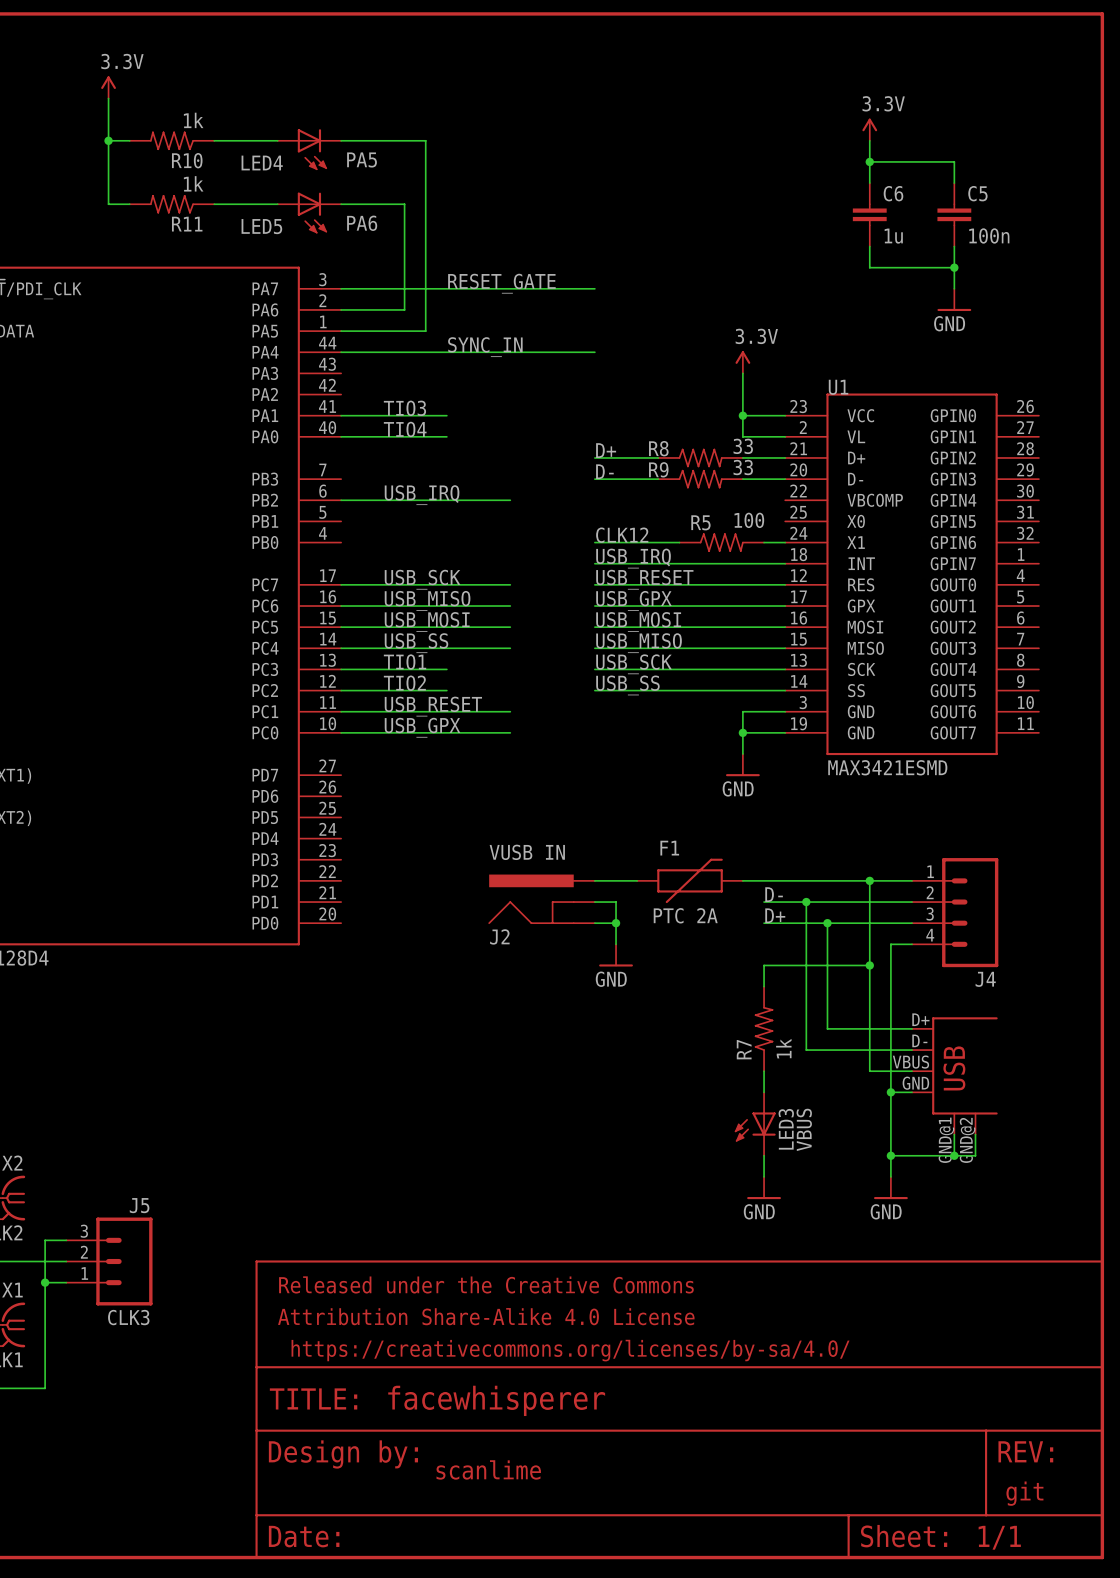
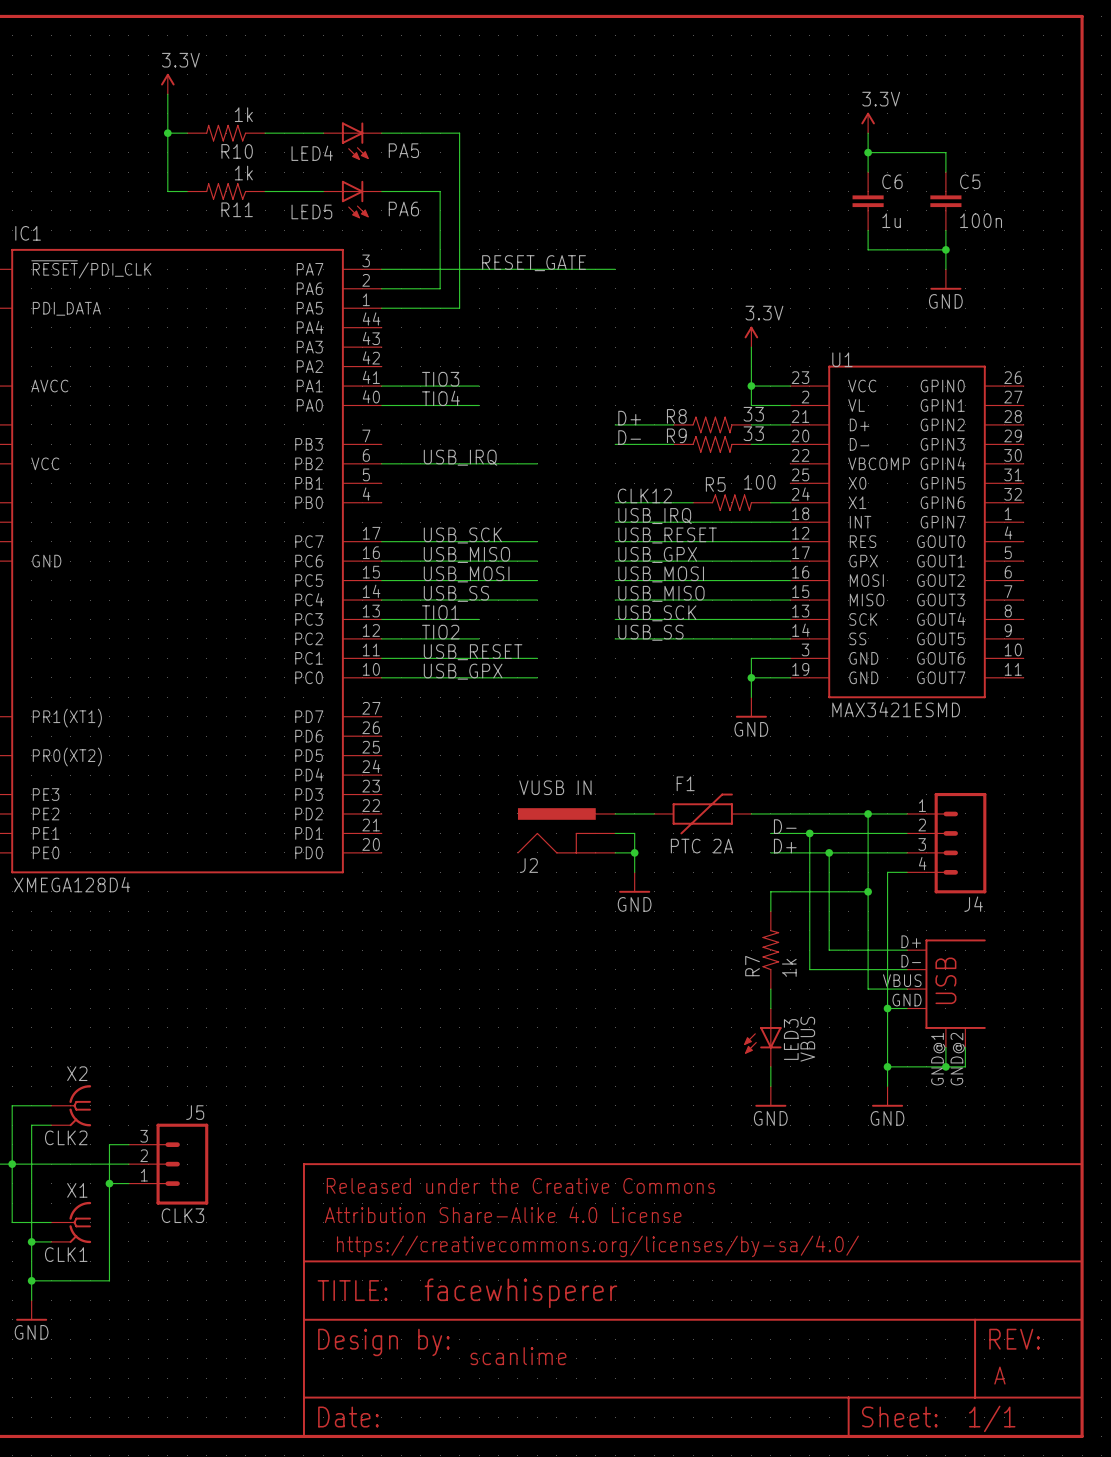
label: SYNC_IN (485, 347) -> none
wire: (341, 352) (594, 352) -> none
text: git (1024, 1493) -> A (999, 1375)

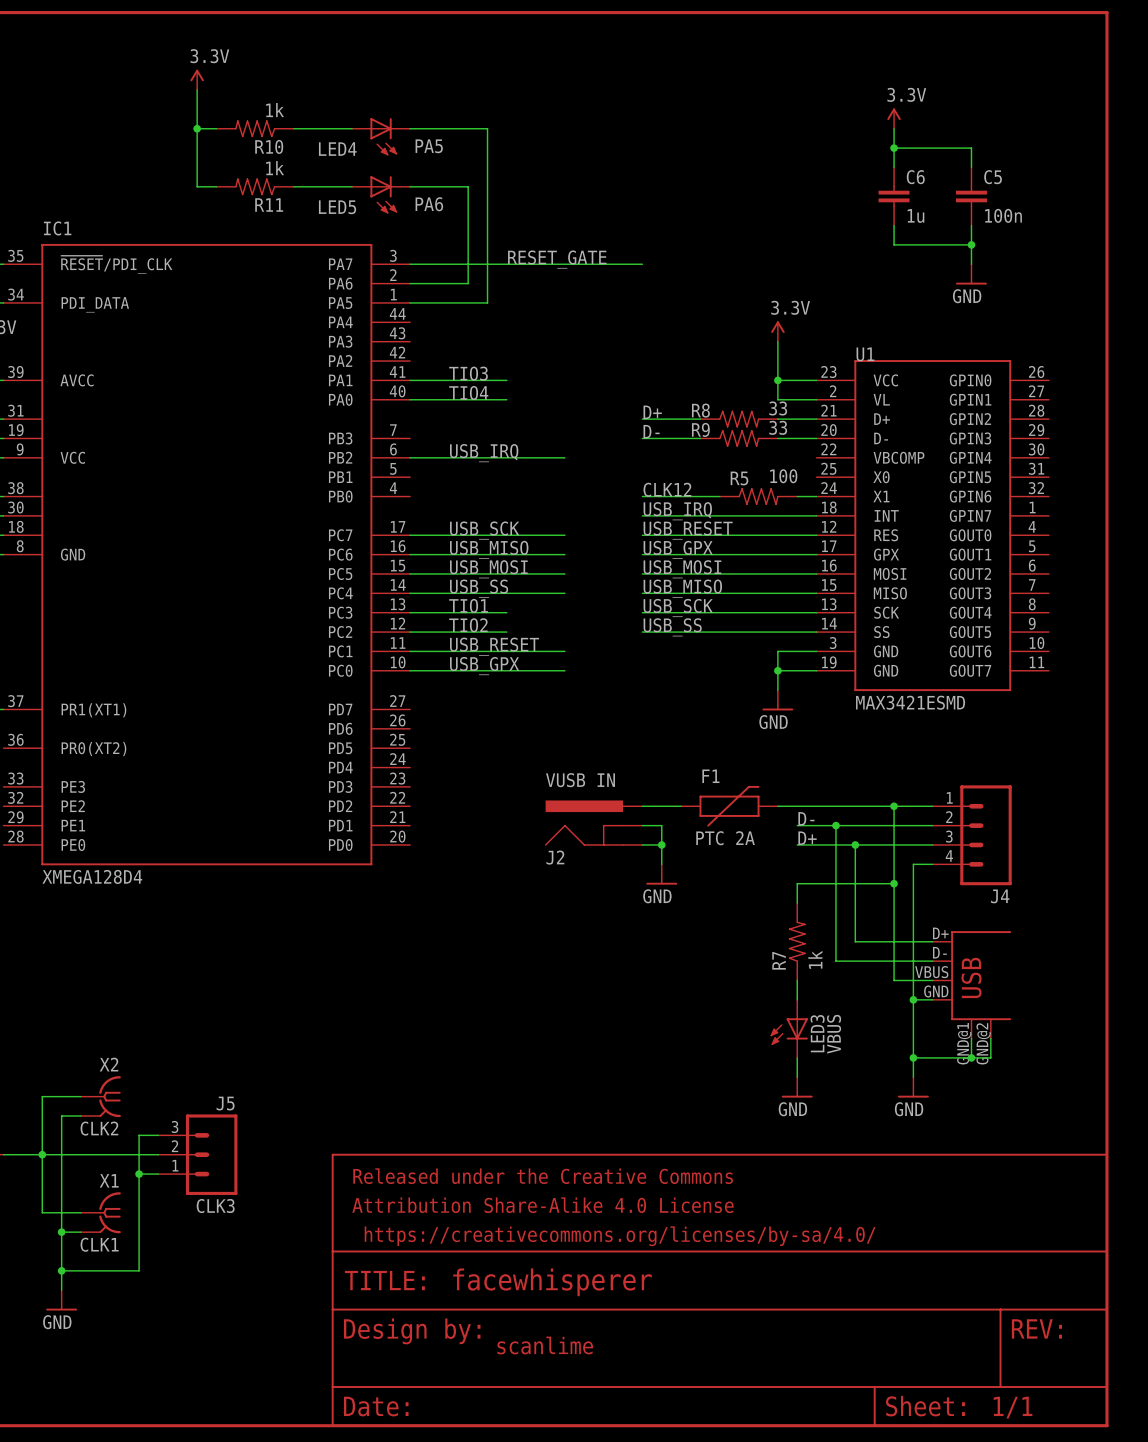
text: A (999, 1375) -> none

